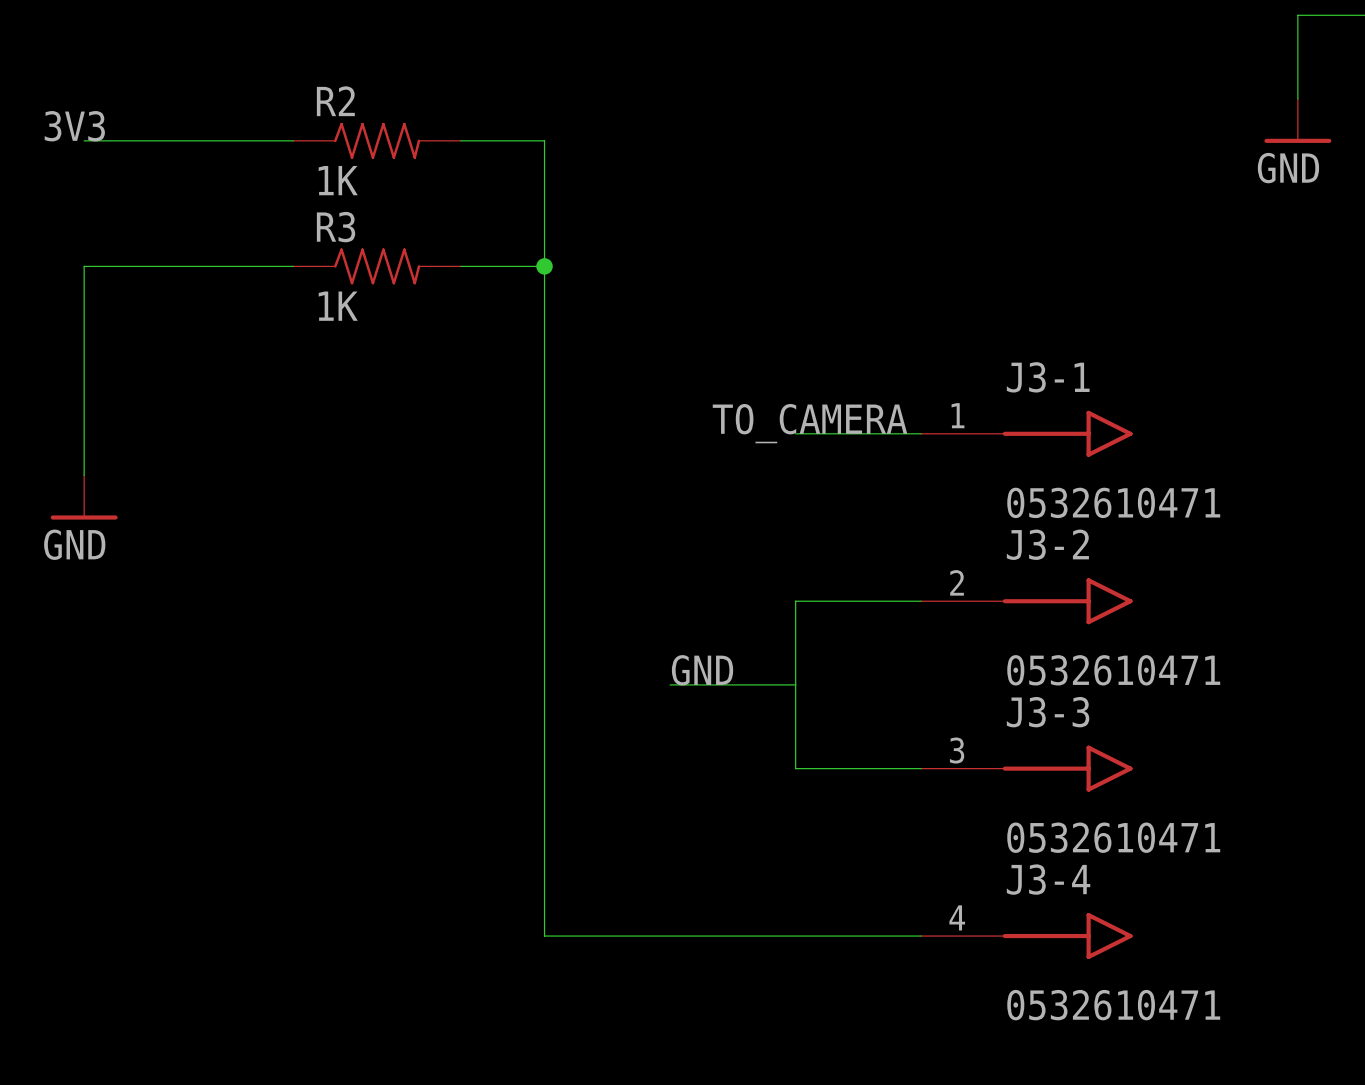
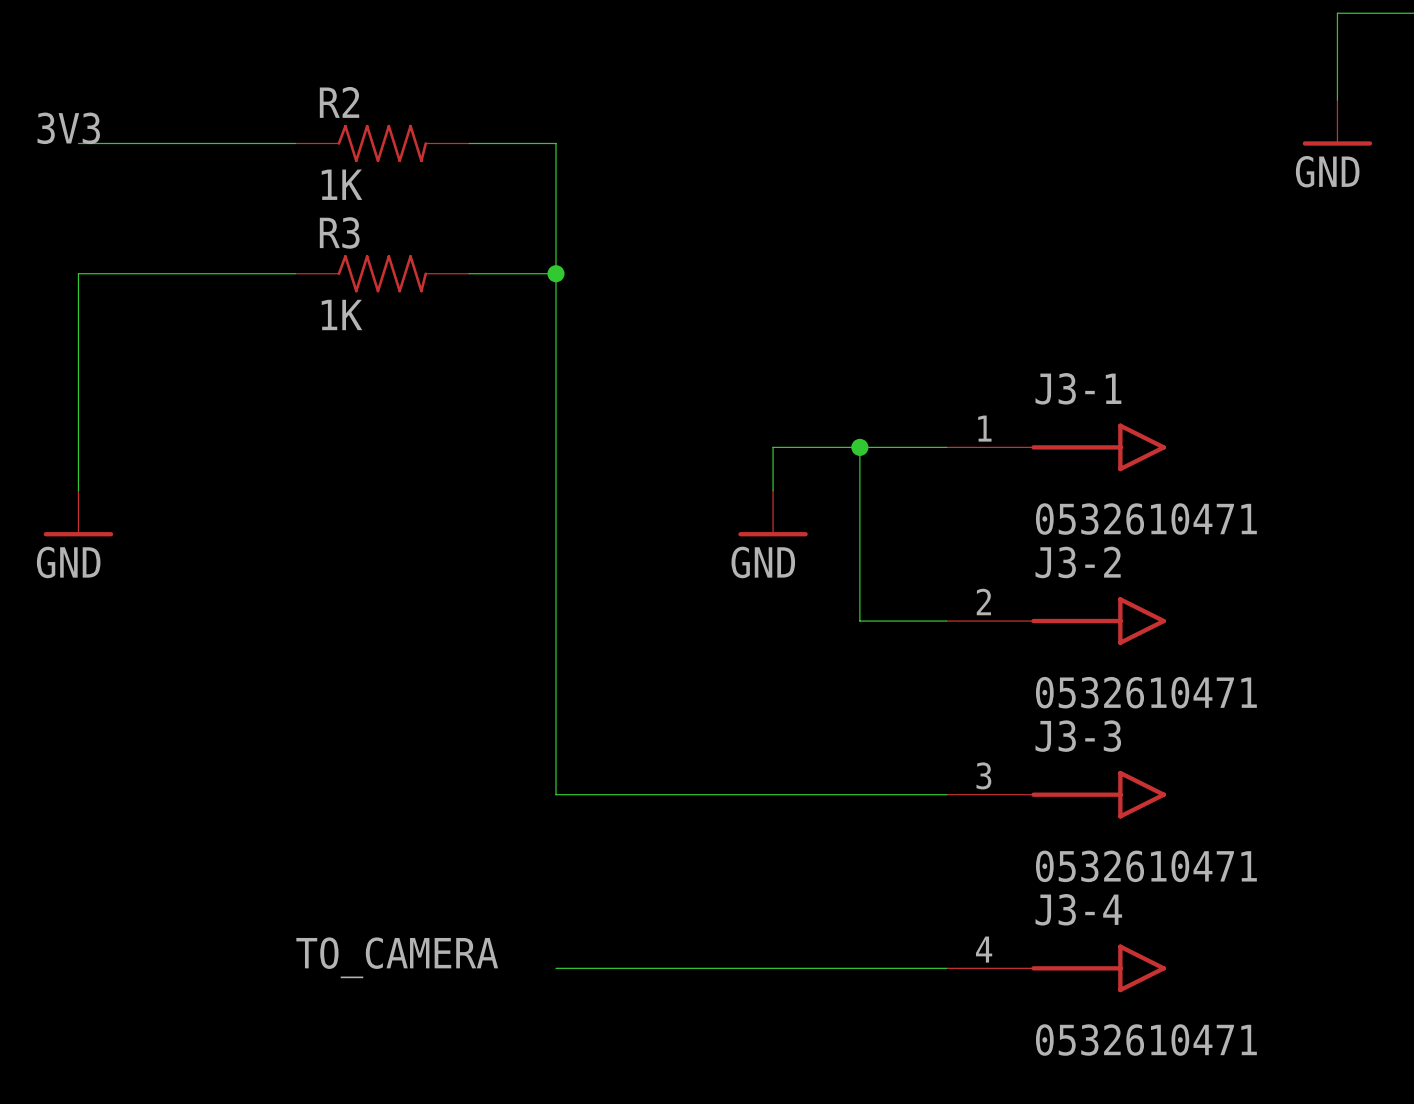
label: TO_CAMERA (810, 423) -> none
wire: none -> (816, 447) (773, 447) (773, 490)
junction: none -> (859, 447)
power symbol: none -> GND (773, 513)
wire: (837, 601) (795, 601) (795, 768) -> (859, 621) (859, 447)
label: GND (702, 670) -> none
wire: (670, 684) (795, 684) -> none
wire: (544, 768) (544, 936) -> (555, 794) (816, 794)
label: none -> TO_CAMERA (397, 957)

